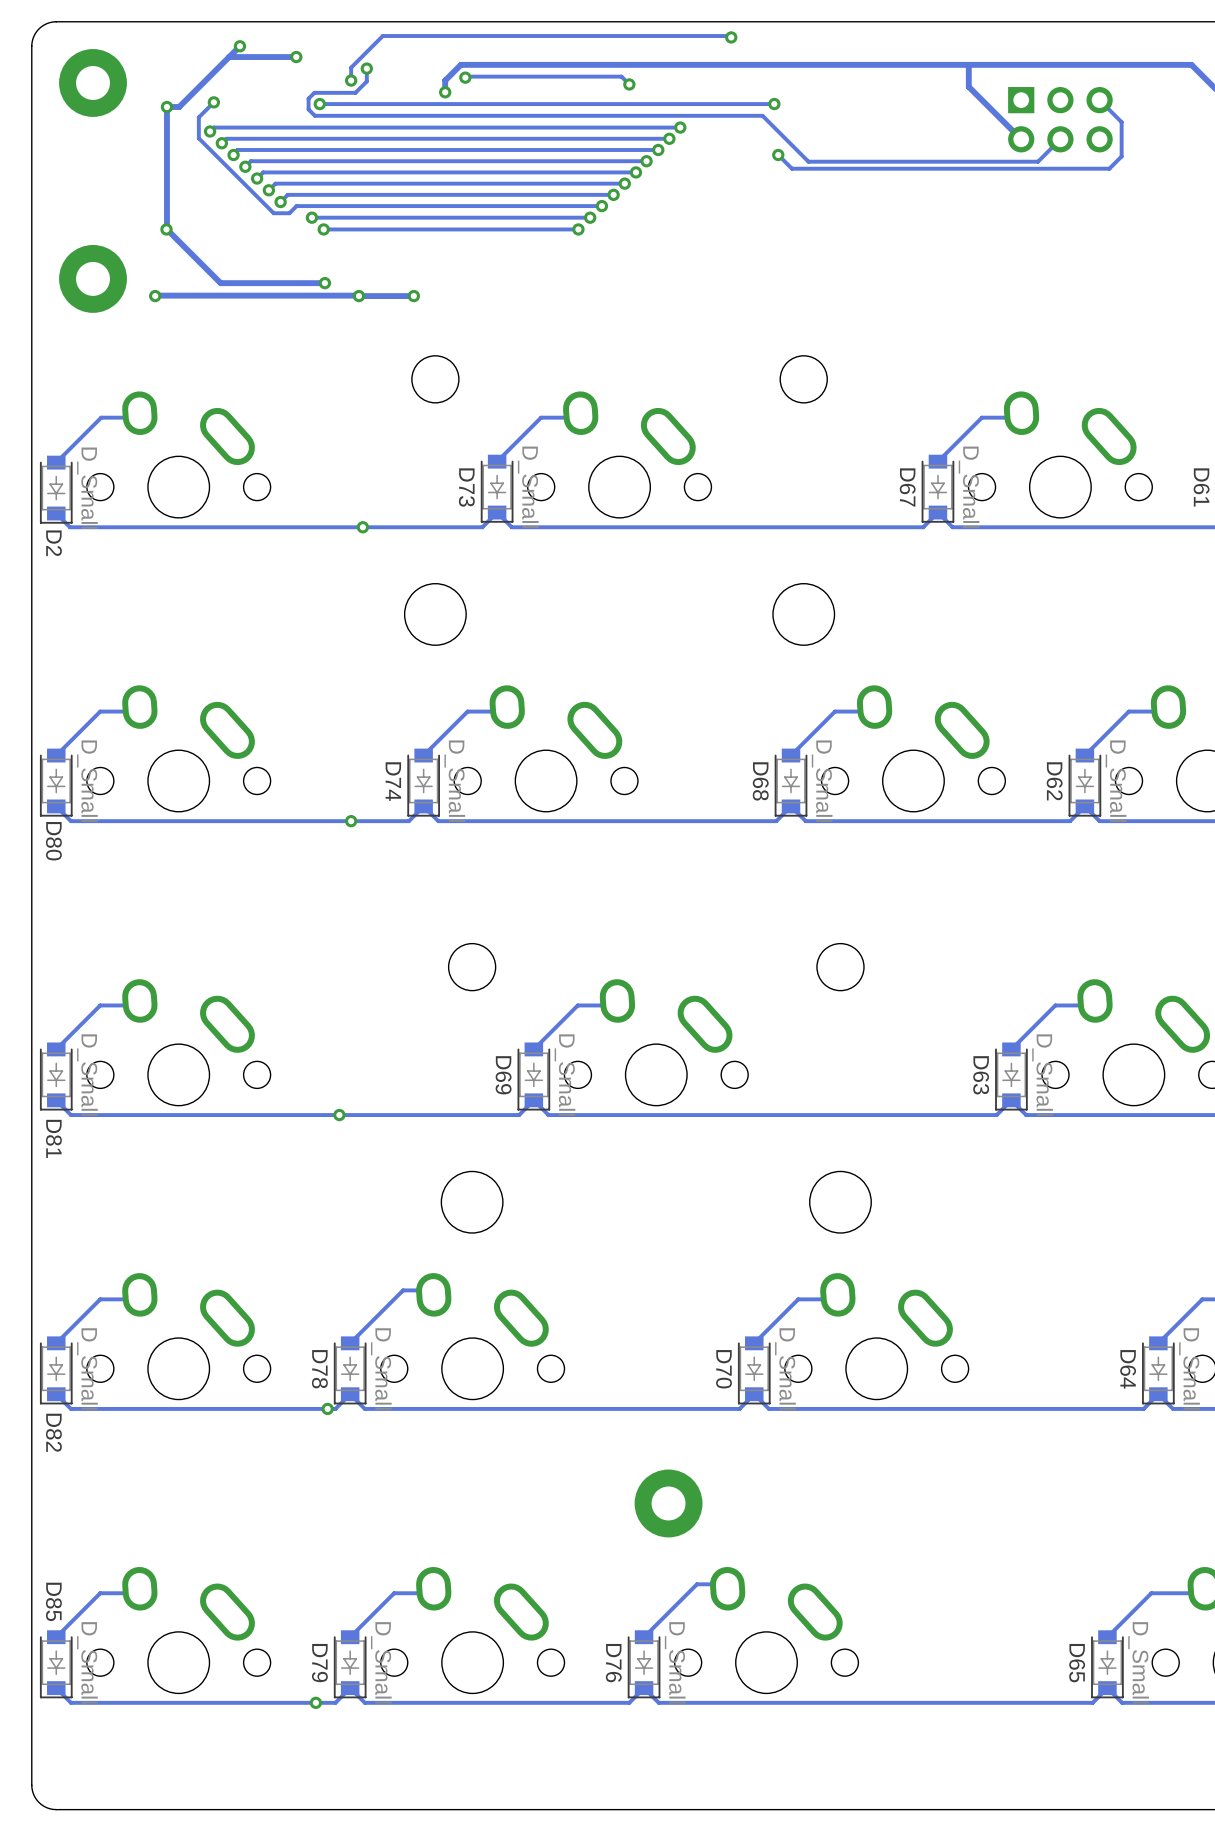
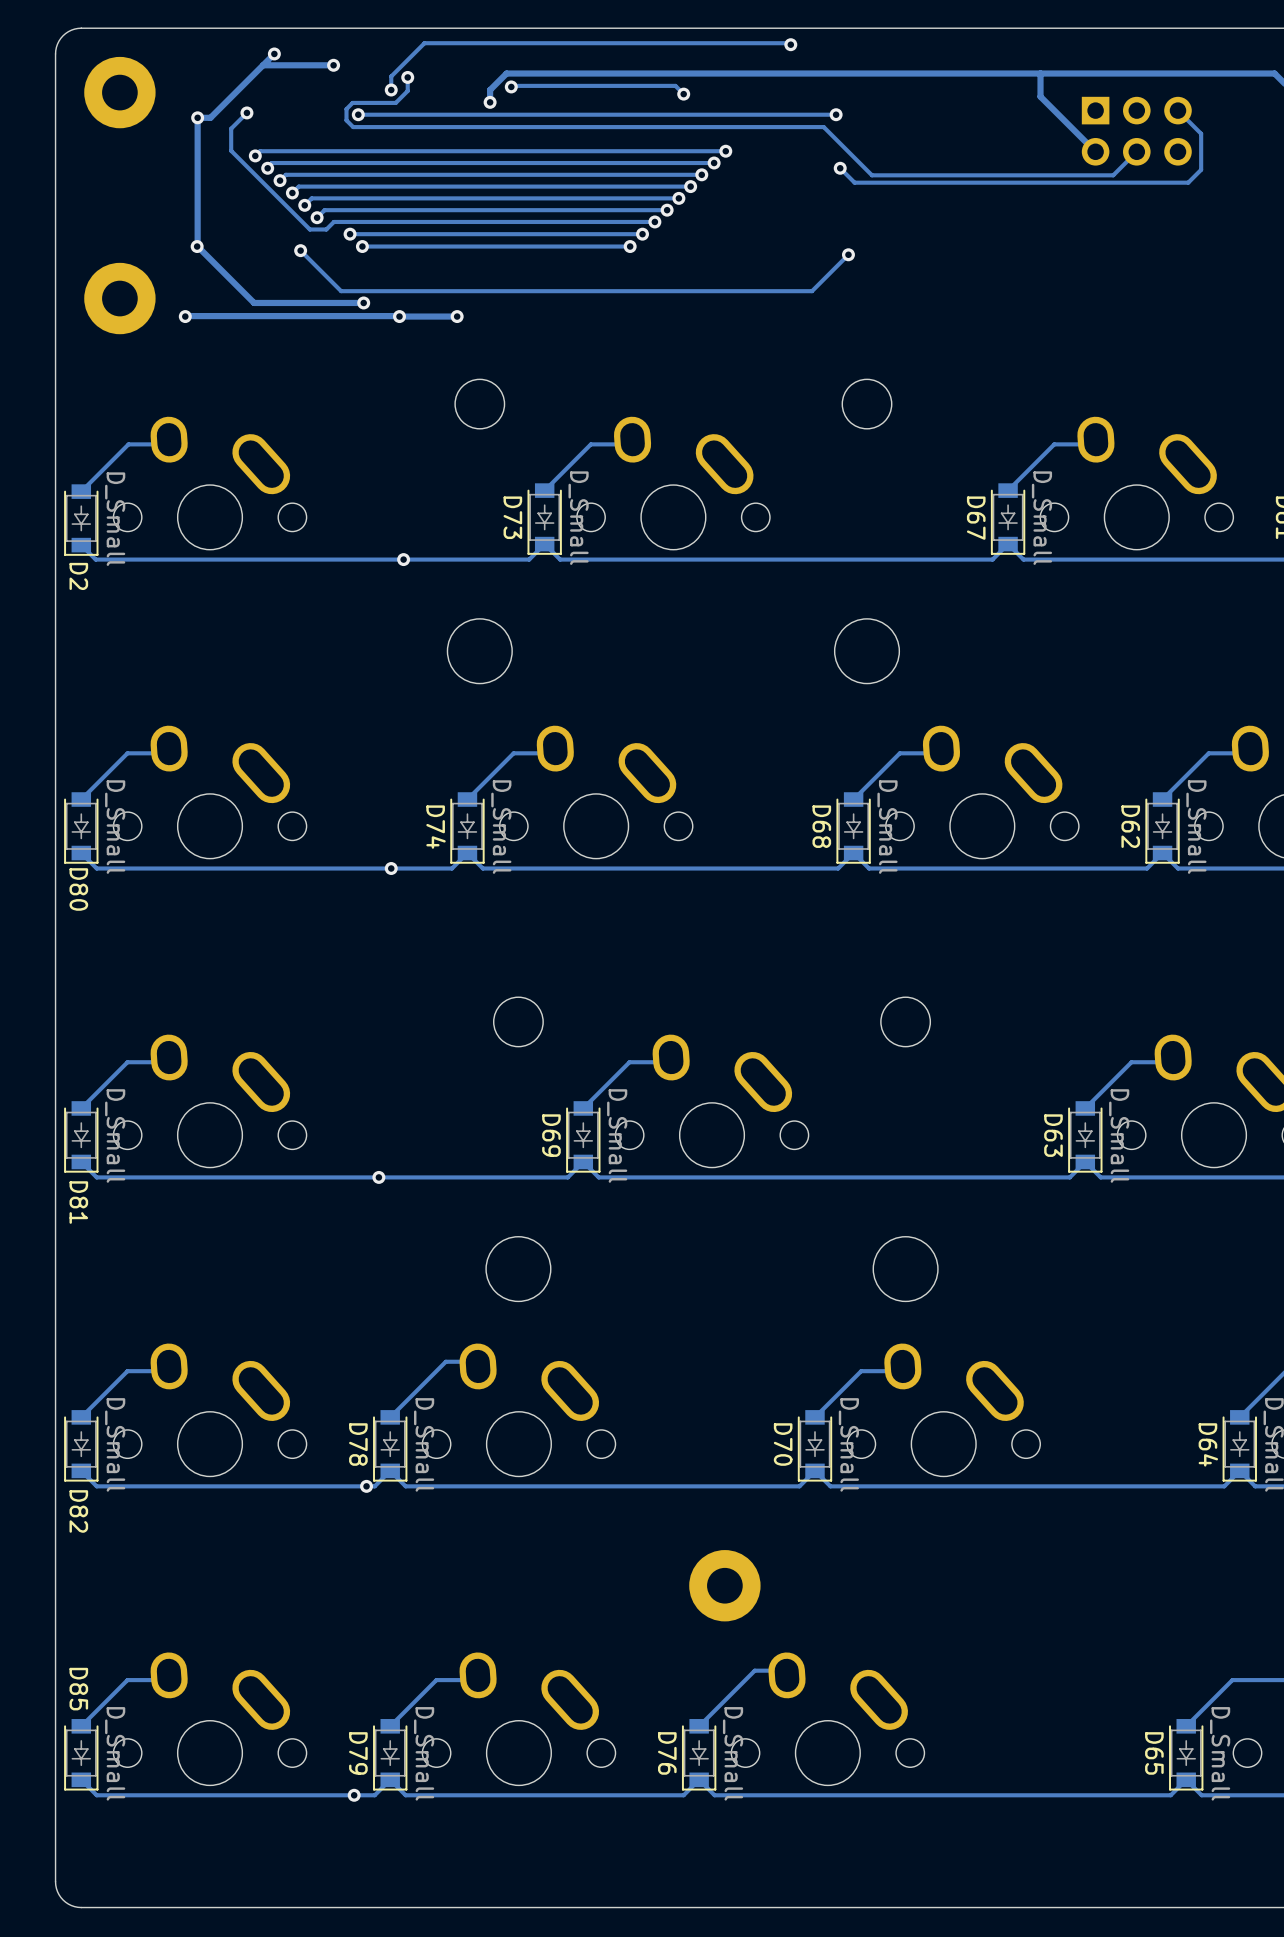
track: (680, 127) (213, 127) (210, 131) -> none
via: (680, 127) -> none
via: (210, 131) -> none
track: none -> (300, 250) (341, 291) (812, 291) (848, 254)
via: none -> (300, 250)
via: none -> (848, 254)

